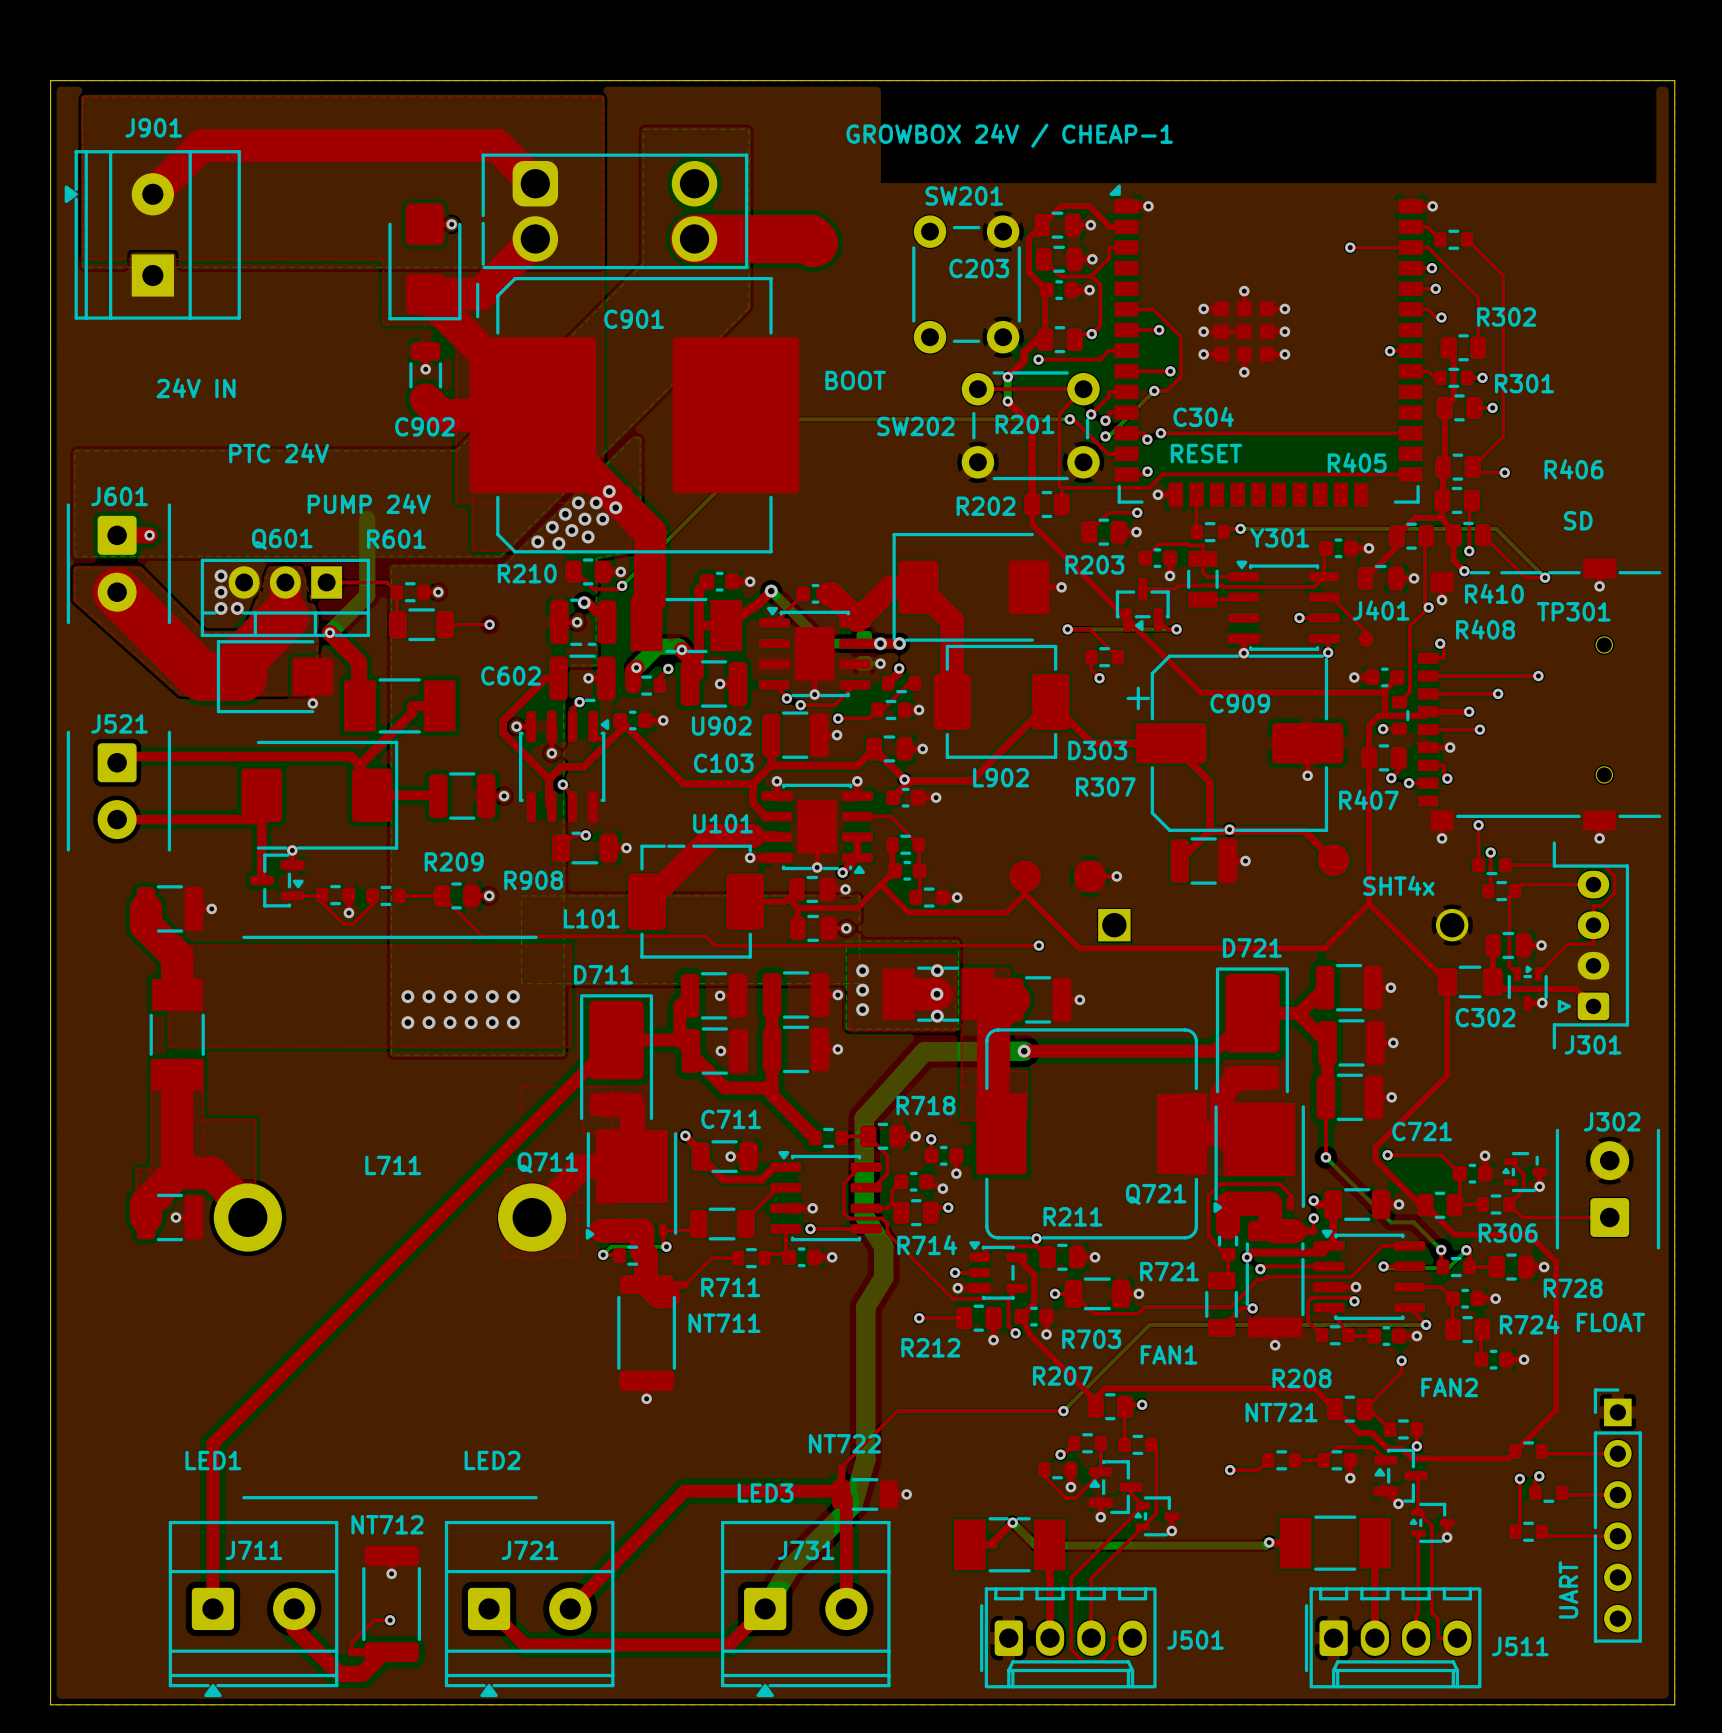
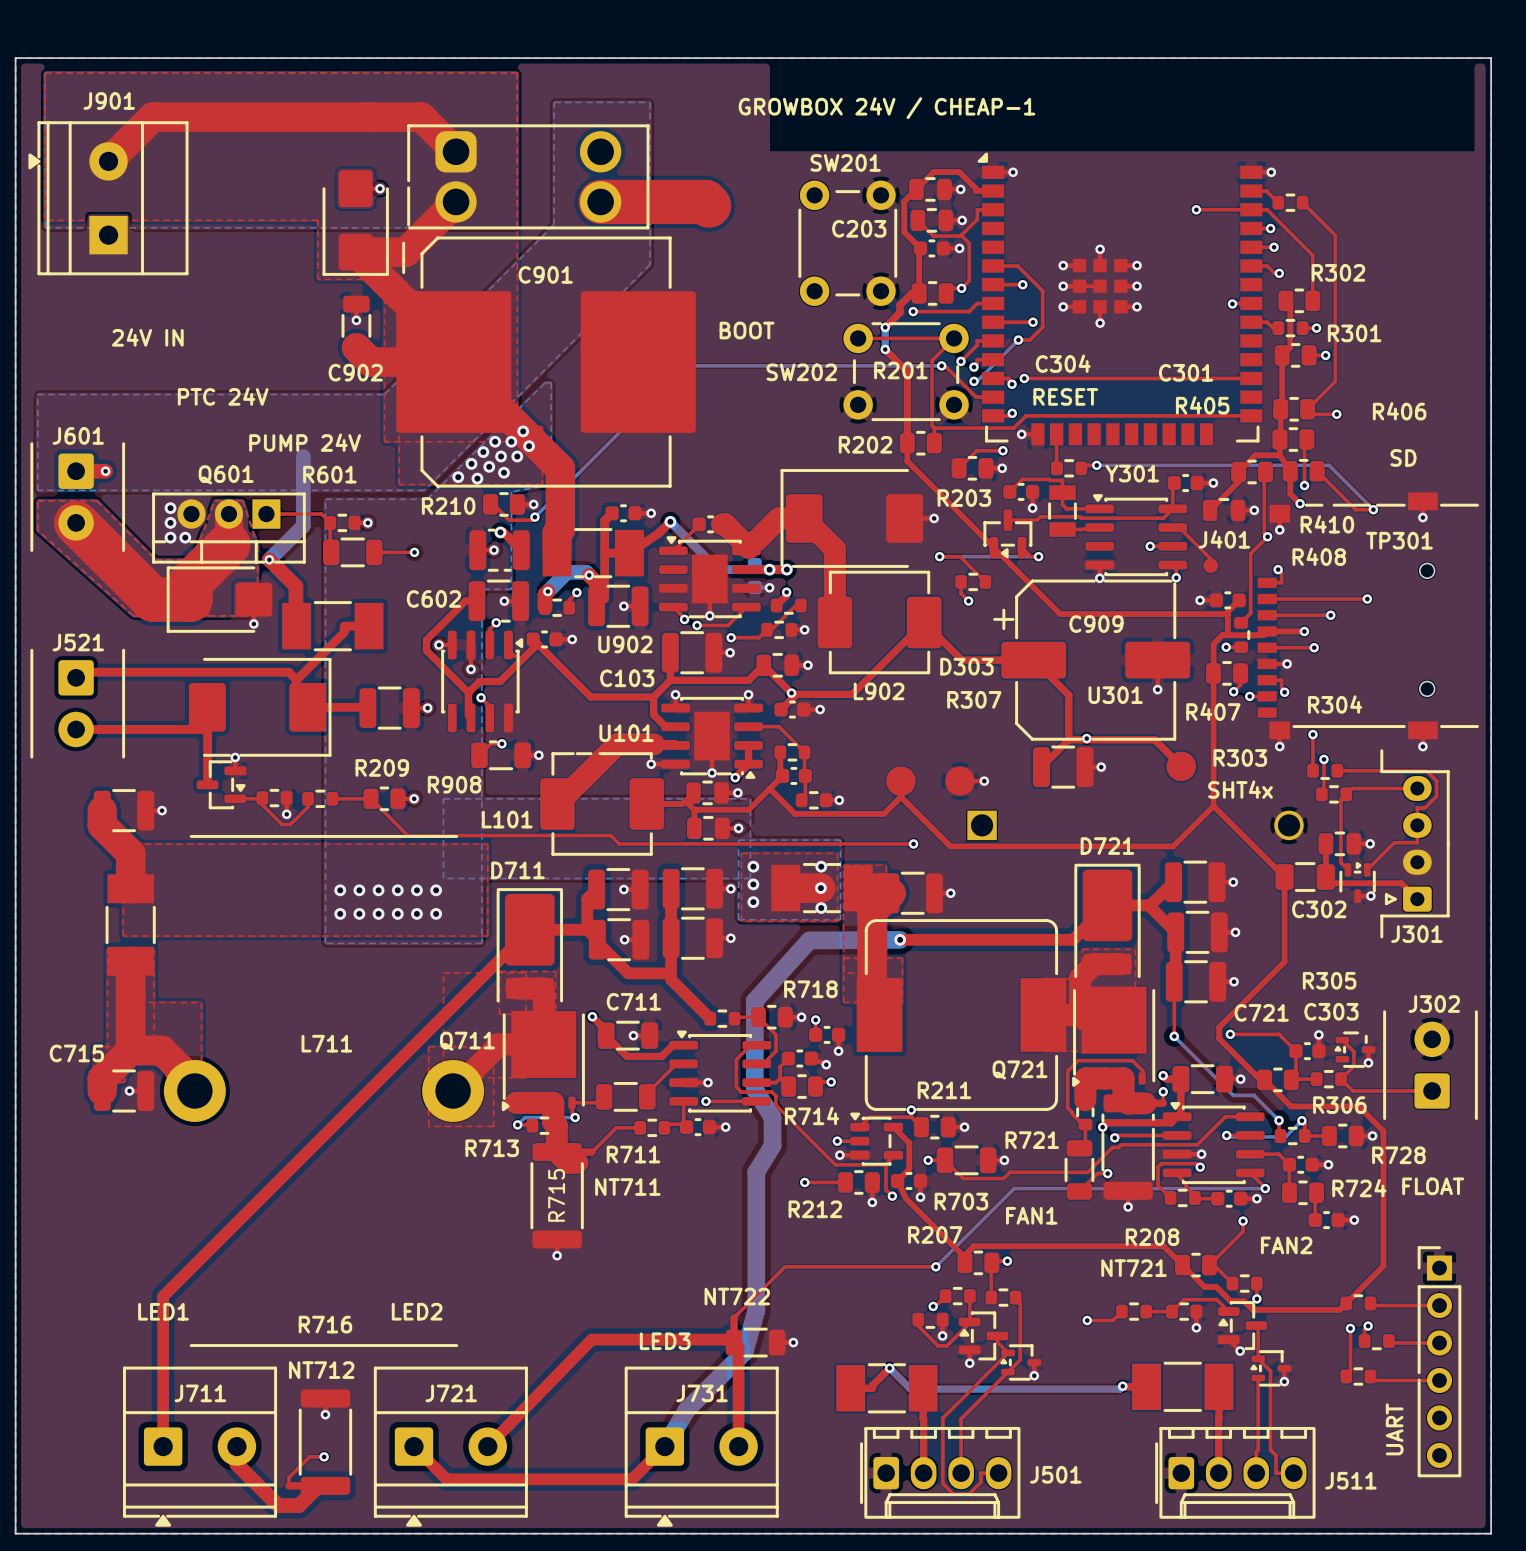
C301 name: none -> C301 (1186, 372)
U301 name: none -> U301 (1115, 695)
R304 name: none -> R304 (1335, 704)
R303 name: none -> R303 (1240, 757)
R305 name: none -> R305 (1329, 980)
C303 name: none -> C303 (1331, 1011)
C715 name: none -> C715 (76, 1053)
R713 name: none -> R713 (492, 1148)
R715 name: none -> R715 (556, 1195)
R716 name: none -> R716 (325, 1324)

